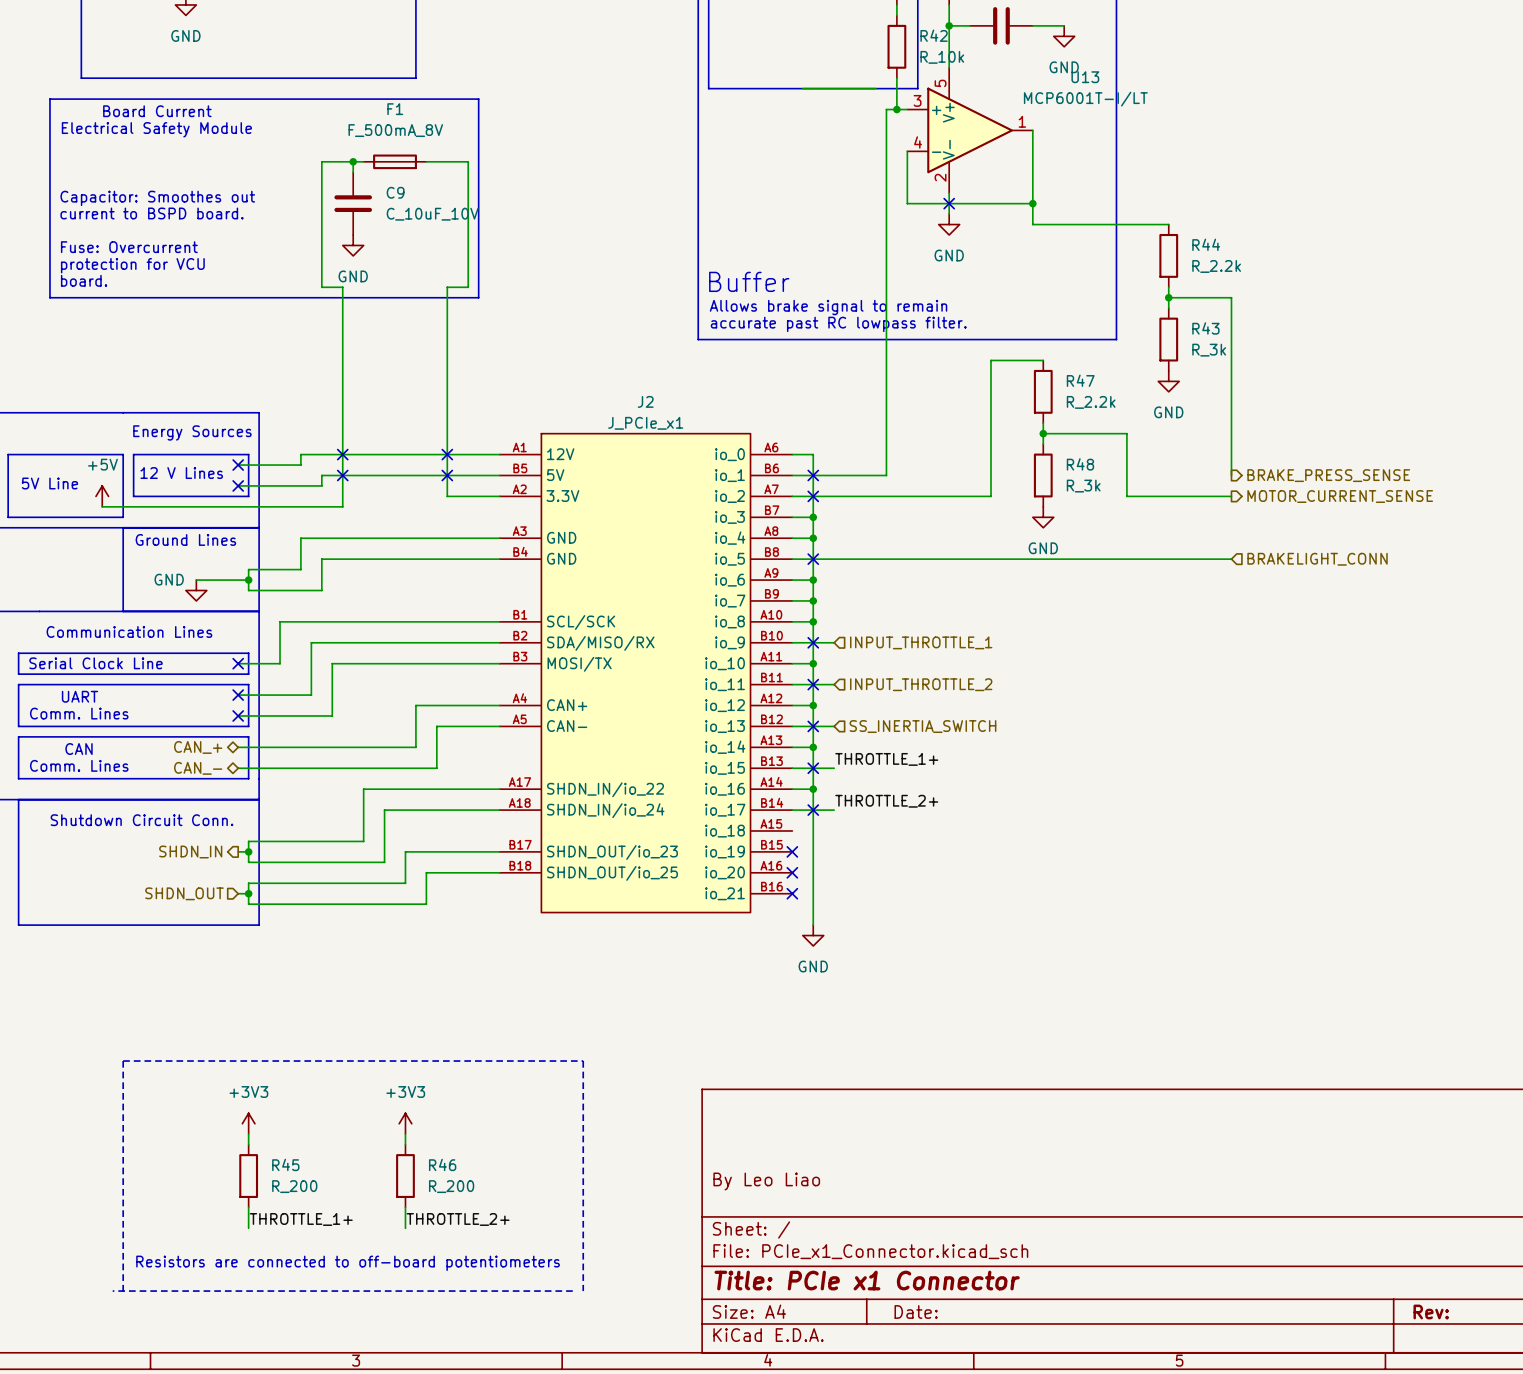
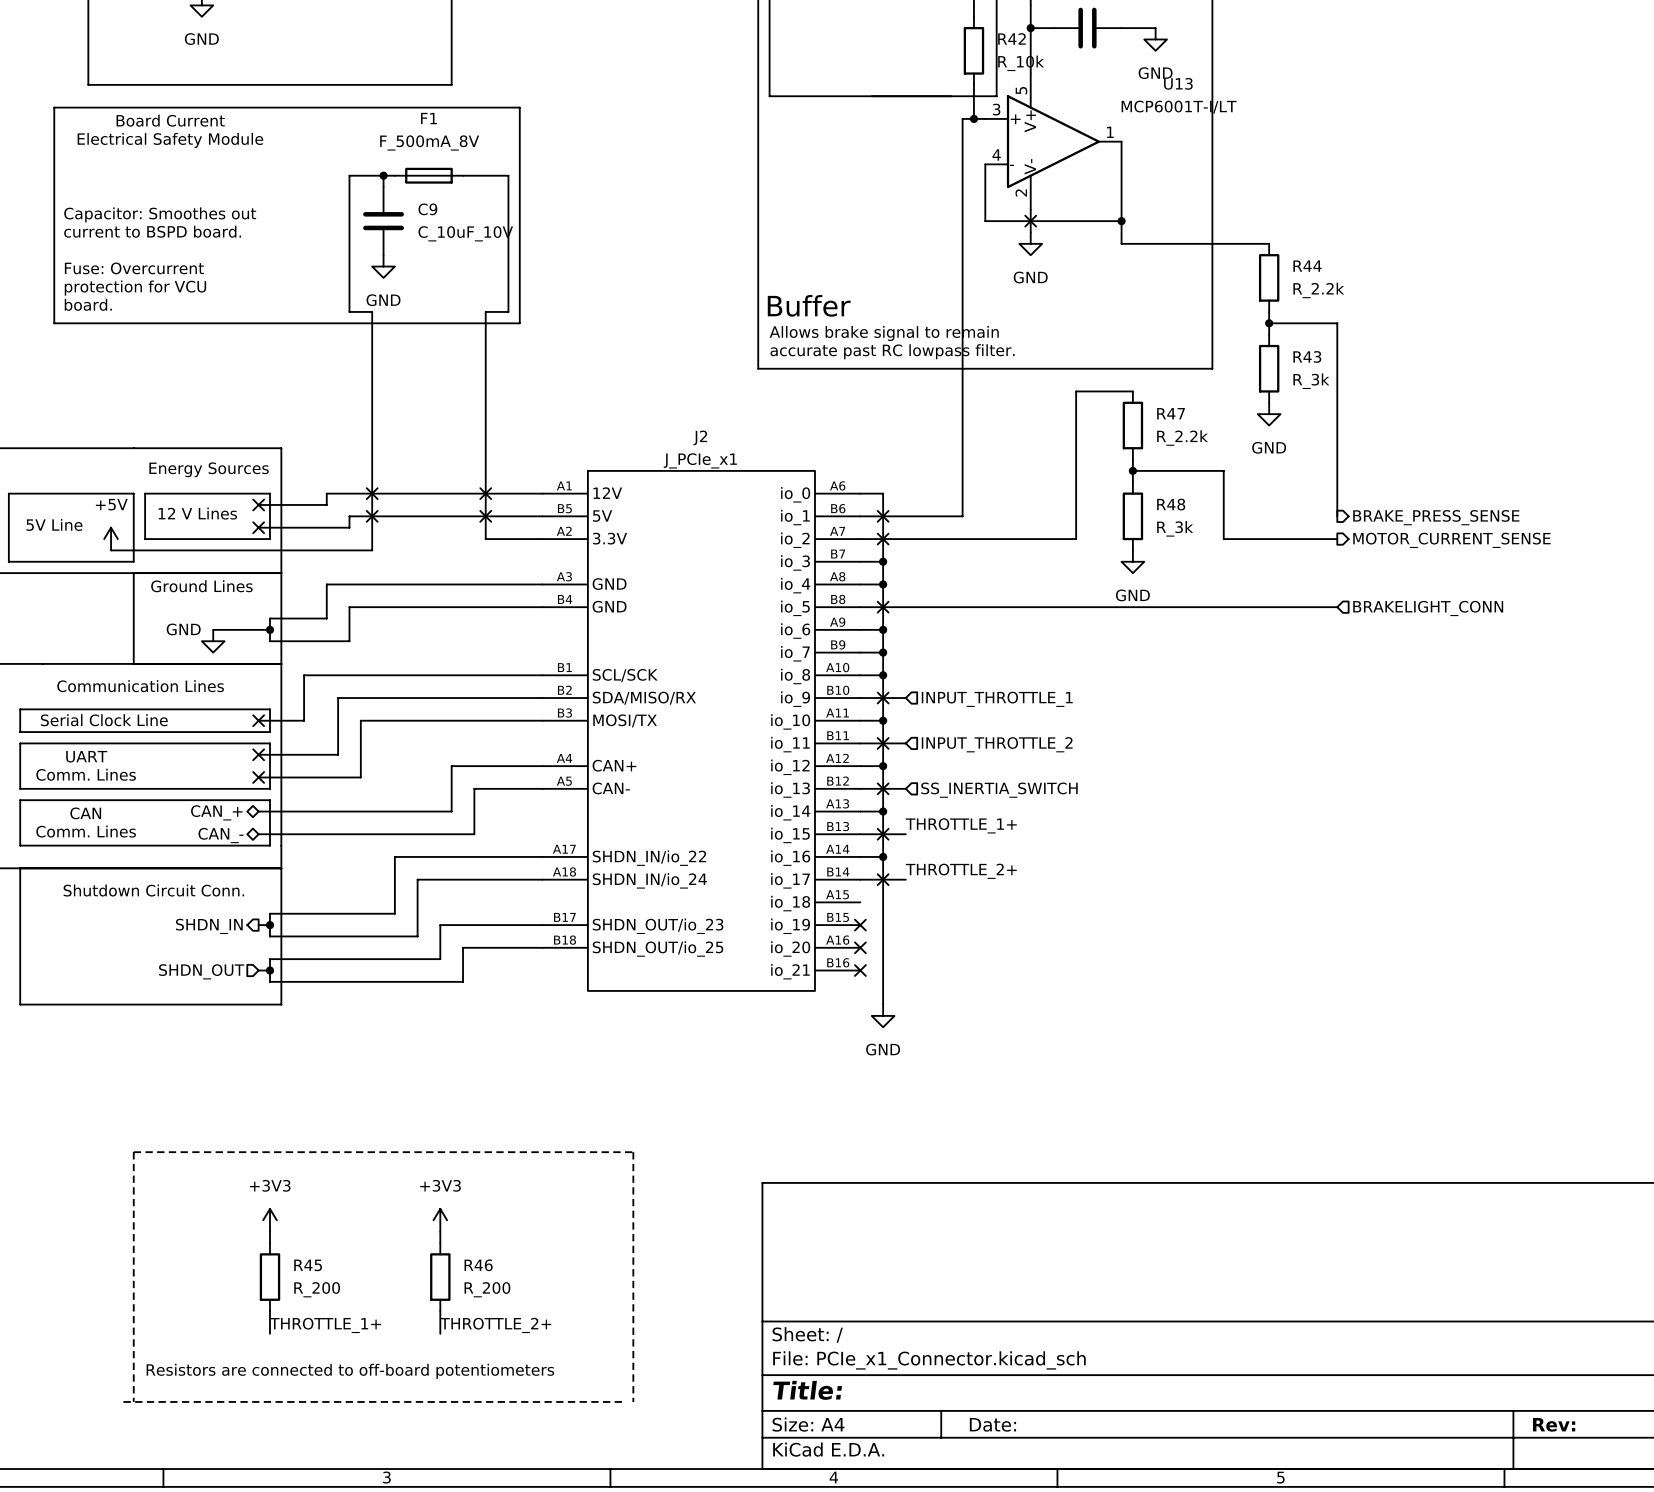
title block: By Leo Liao (766, 1181) -> none
title block: Title: PCIe x1 Connector (867, 1280) -> Title: (807, 1390)

